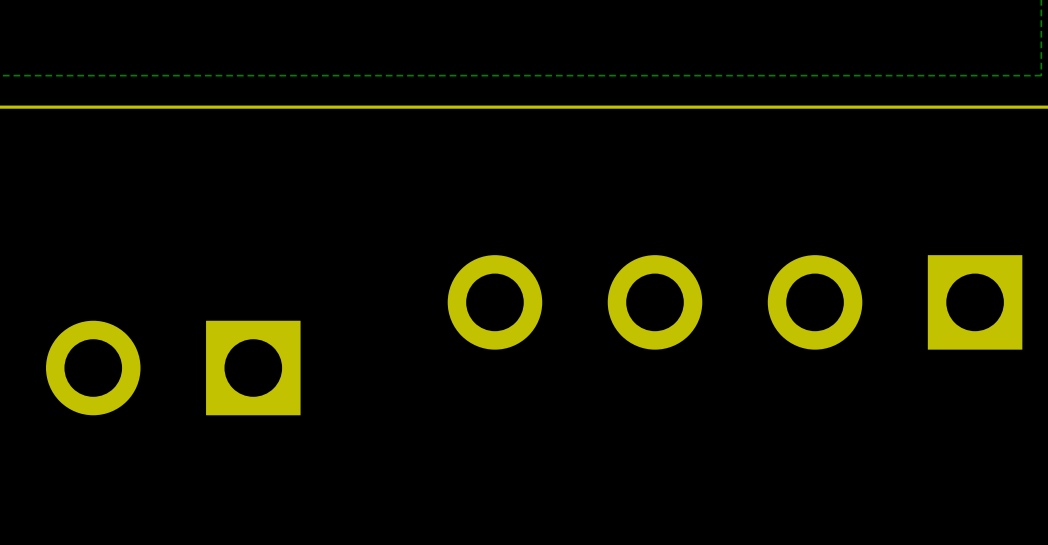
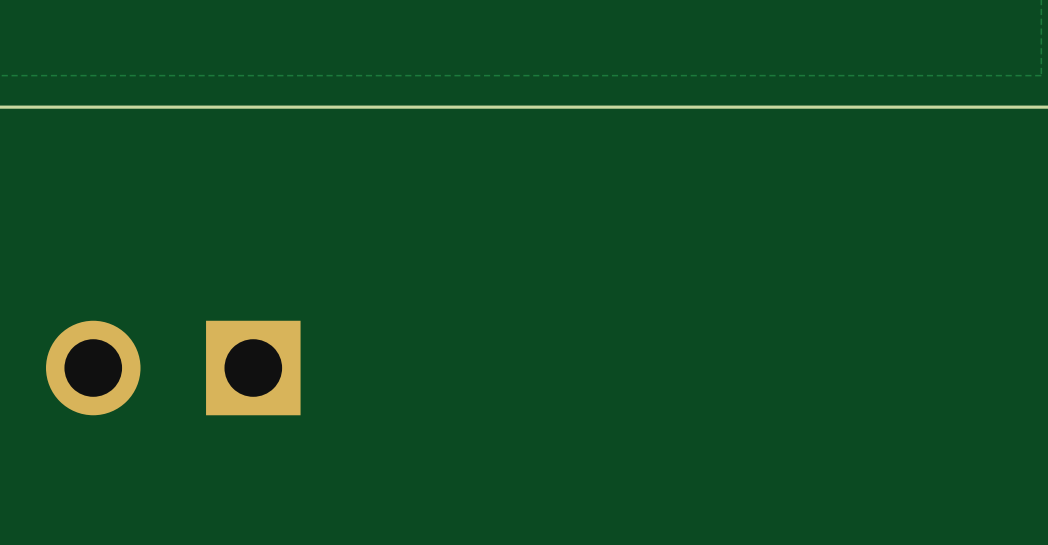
part: (735, 302) -> none

